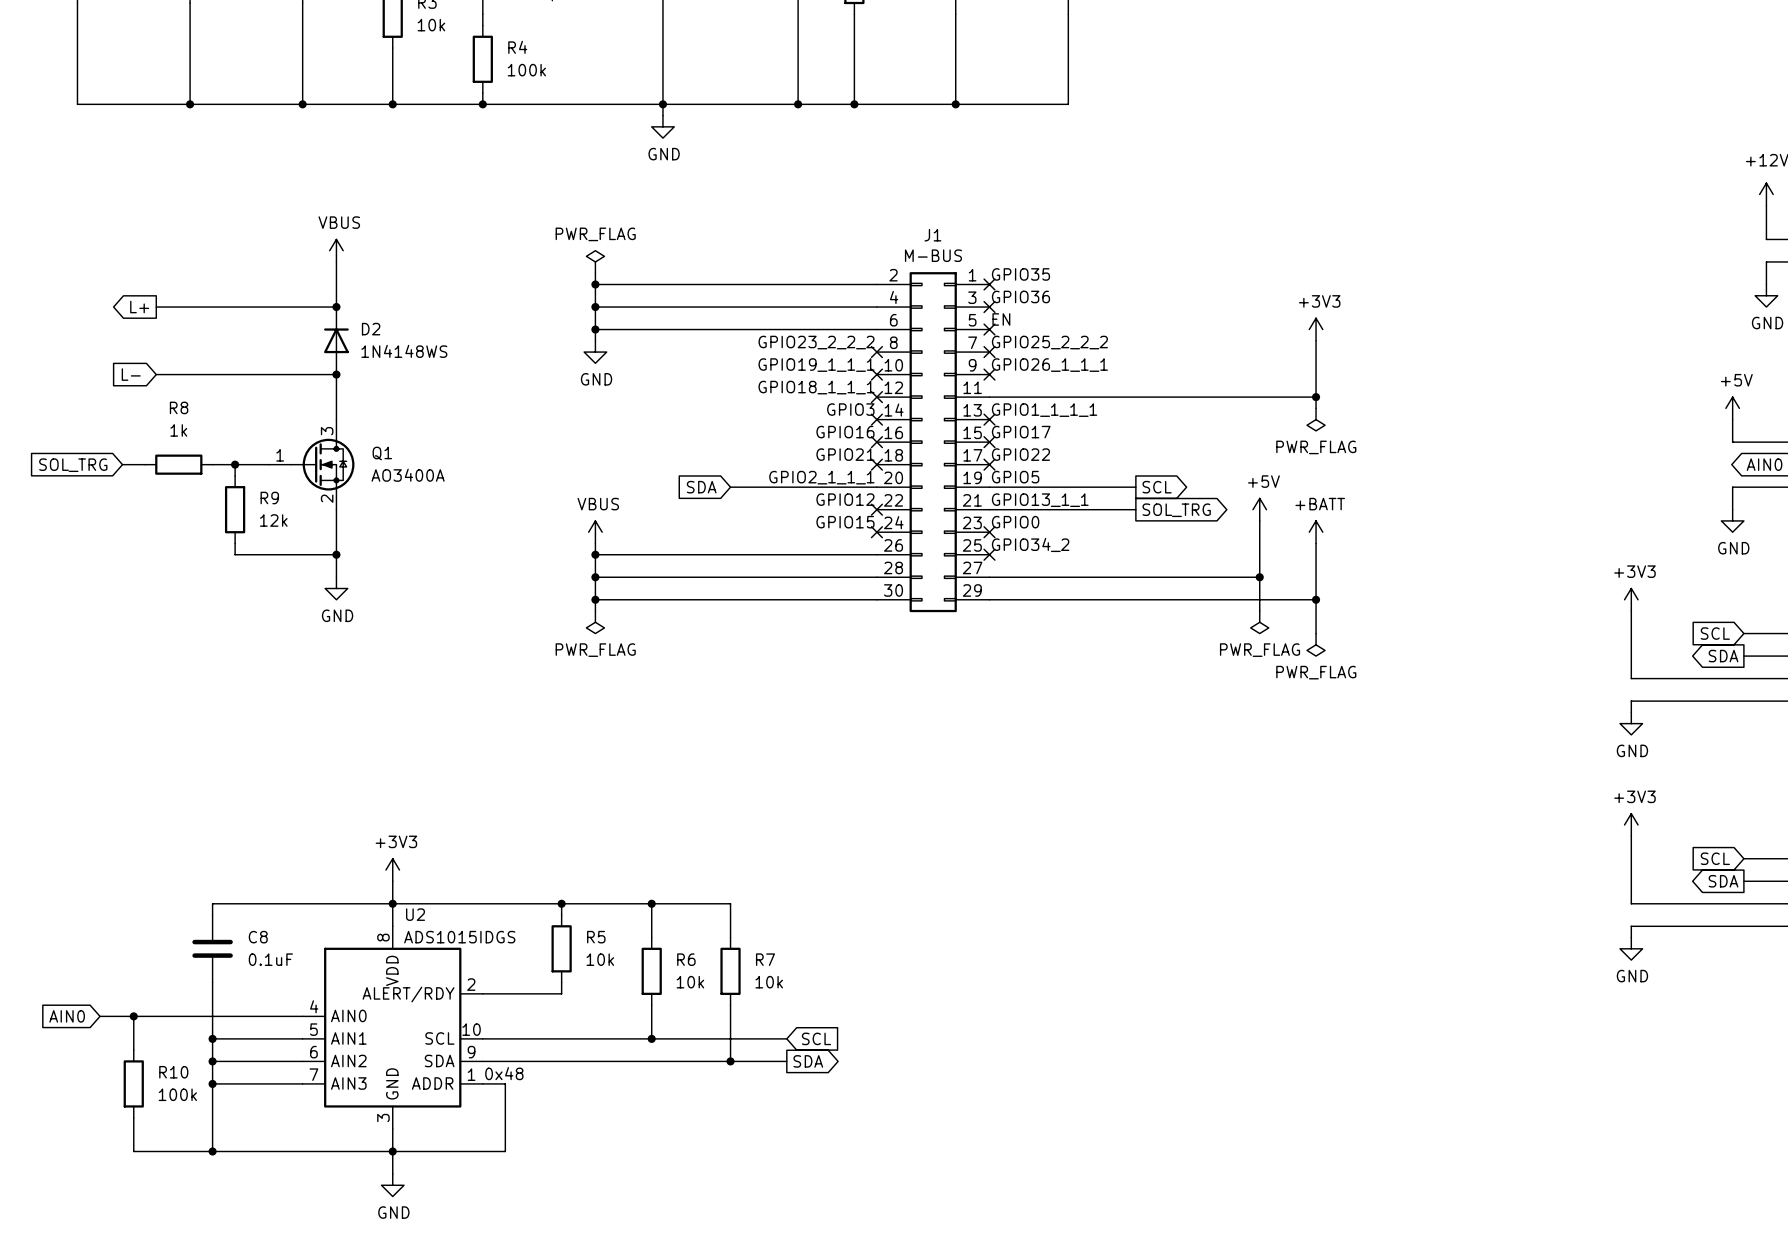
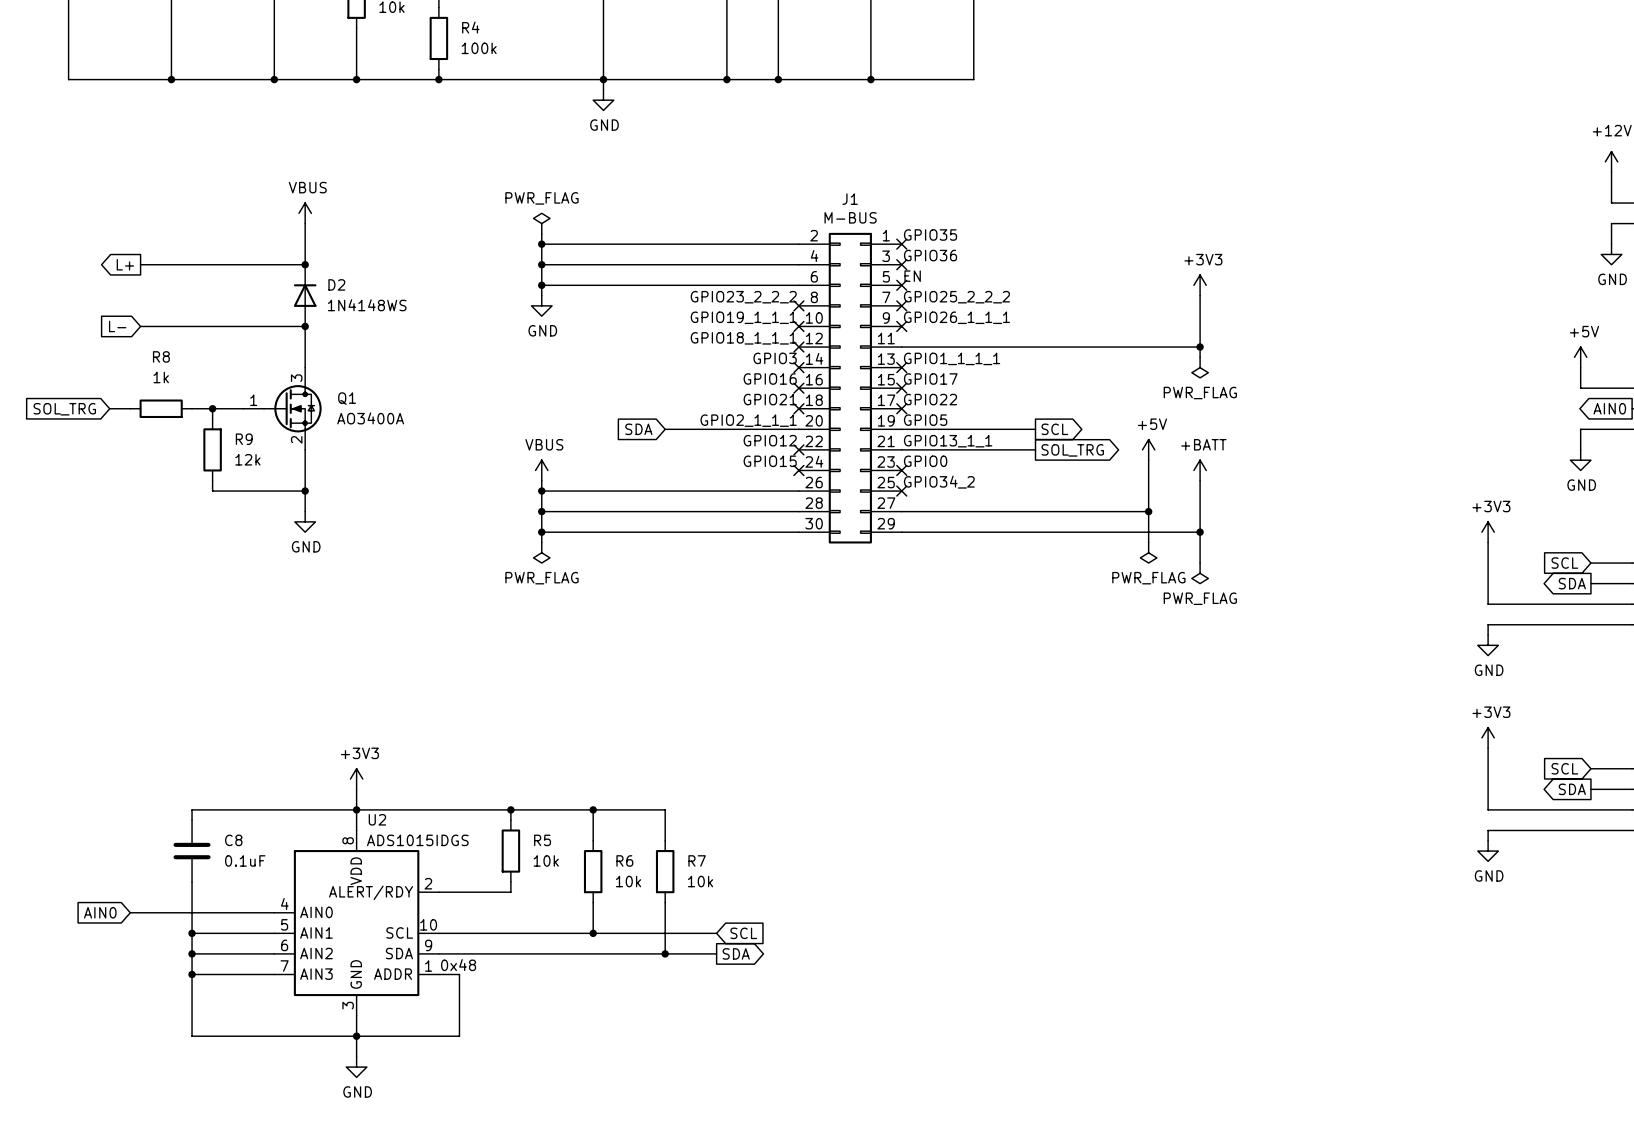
global label position: AIN0 (67, 1016) -> AIN0 (100, 912)
wire: (99, 1016) (145, 1016) -> none
wire: (133, 1016) (133, 1050) -> none
junction: (133, 1016) -> none
R10: 100k (133, 1083) -> none
wire: (133, 1117) (133, 1151) (212, 1151) -> none
junction: (212, 1151) -> none

